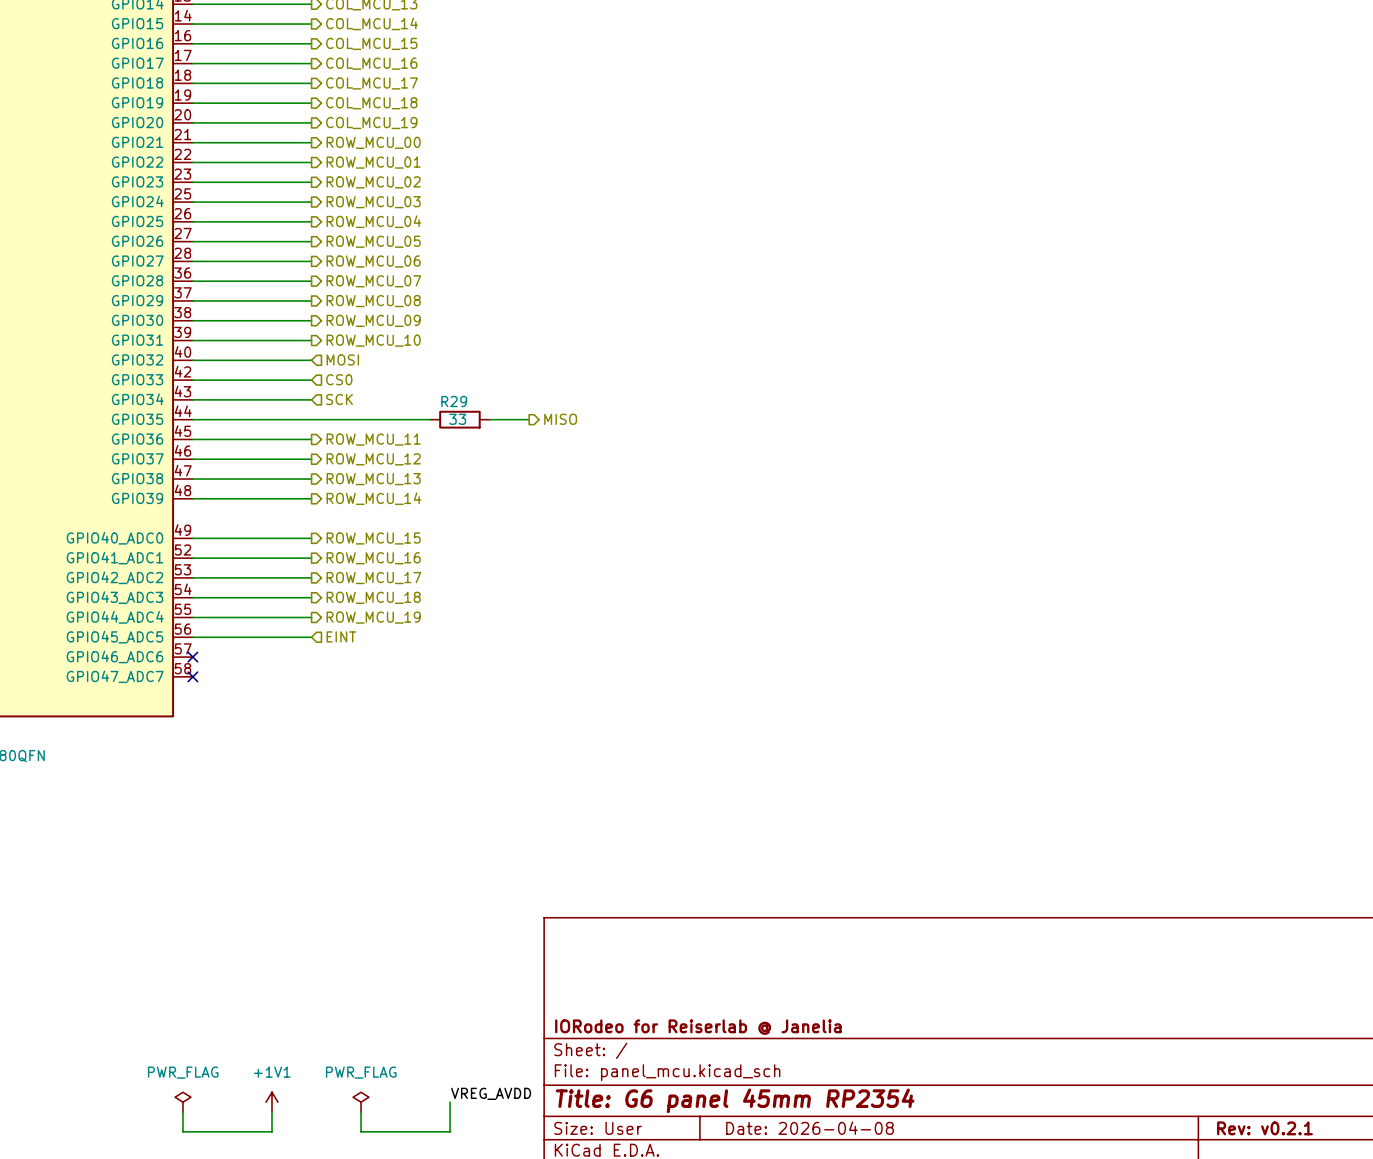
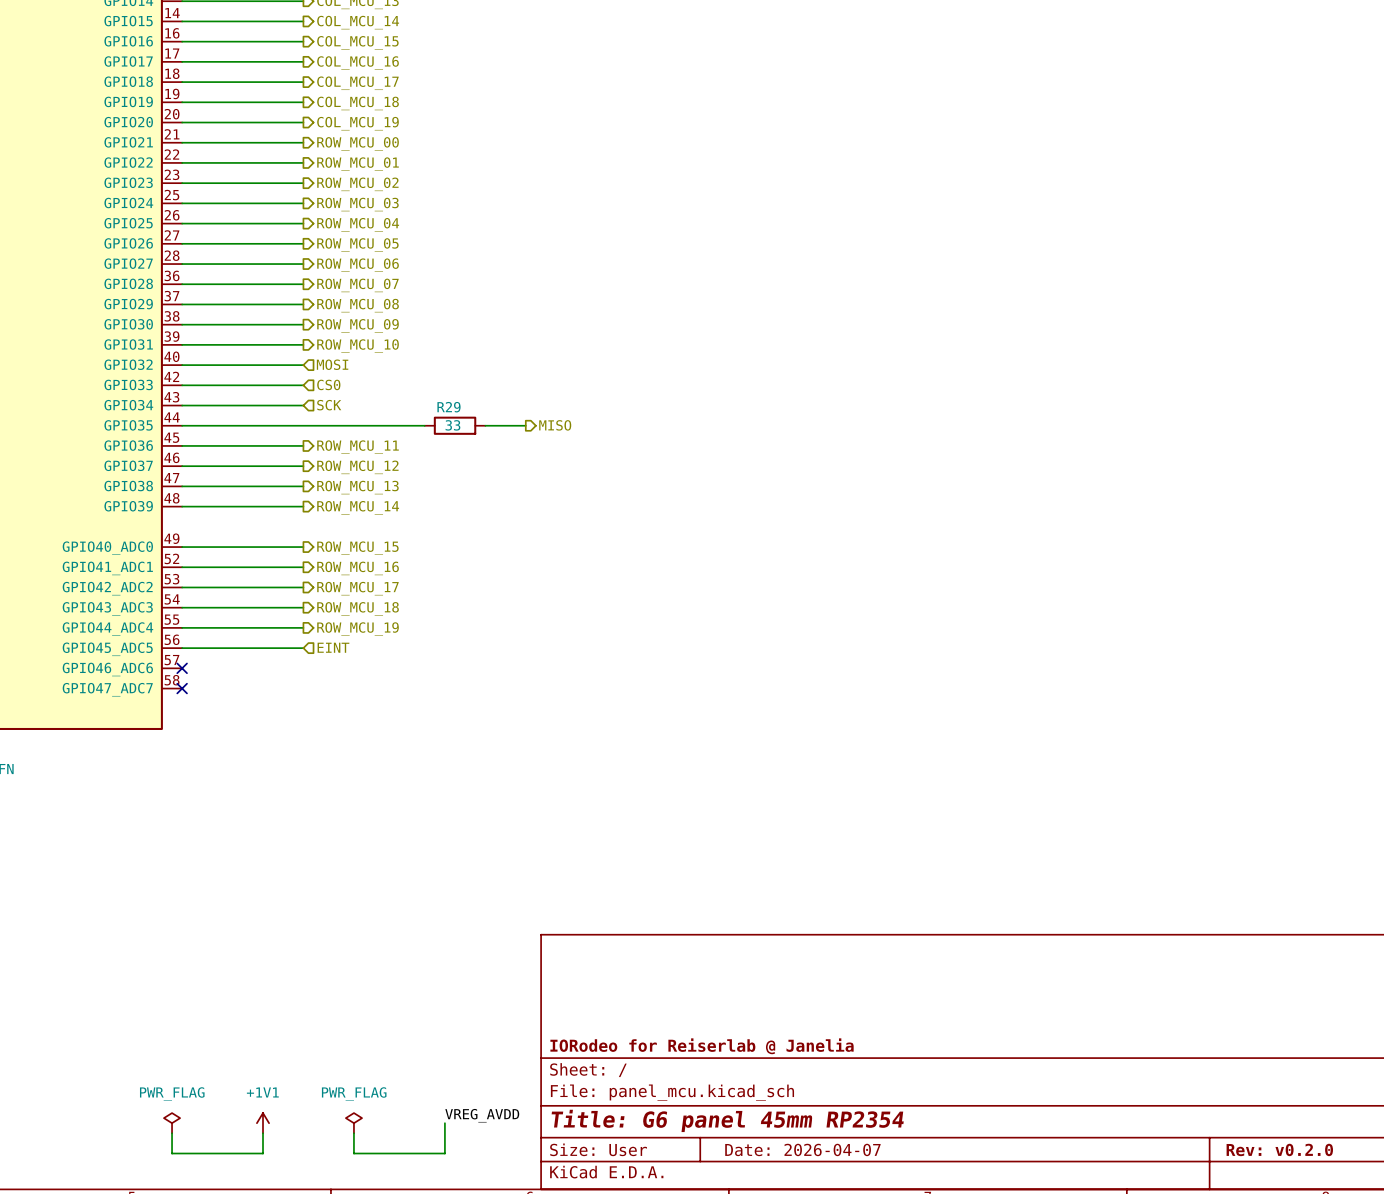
title block: Date: 2026-04-08 (810, 1128) -> Date: 2026-04-07 (802, 1149)
title block: Rev: v0.2.1 (1264, 1128) -> Rev: v0.2.0 (1279, 1149)

